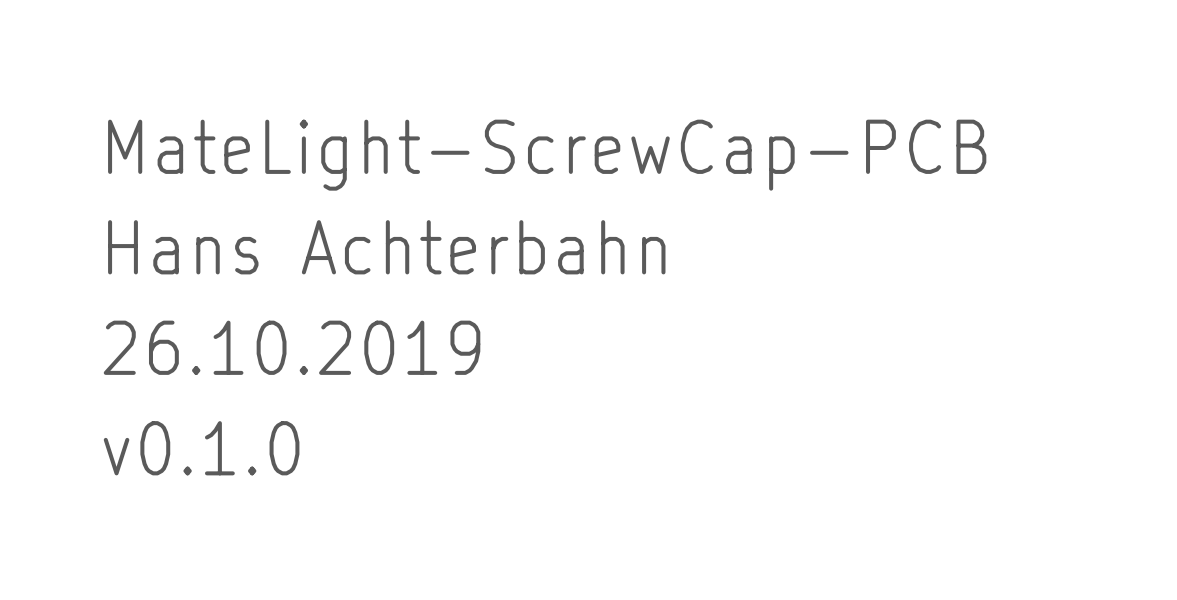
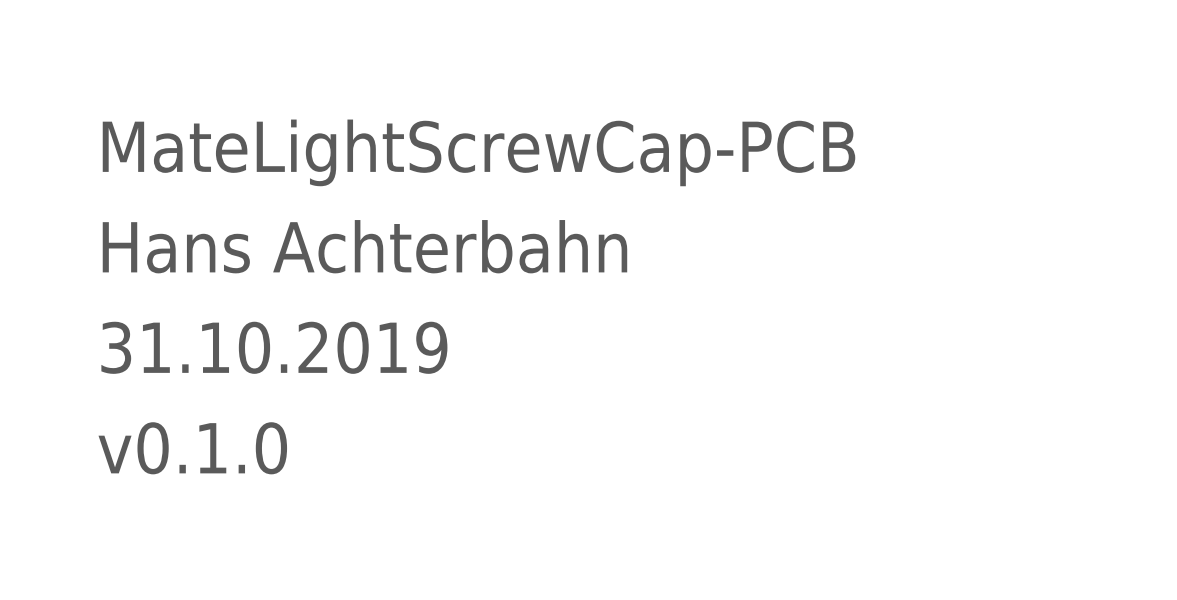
text: MateLight-ScrewCap-PCB (547, 155) -> MateLightScrewCap-PCB (478, 152)
text: 26.10.2019 (292, 347) -> 31.10.2019 (274, 347)

